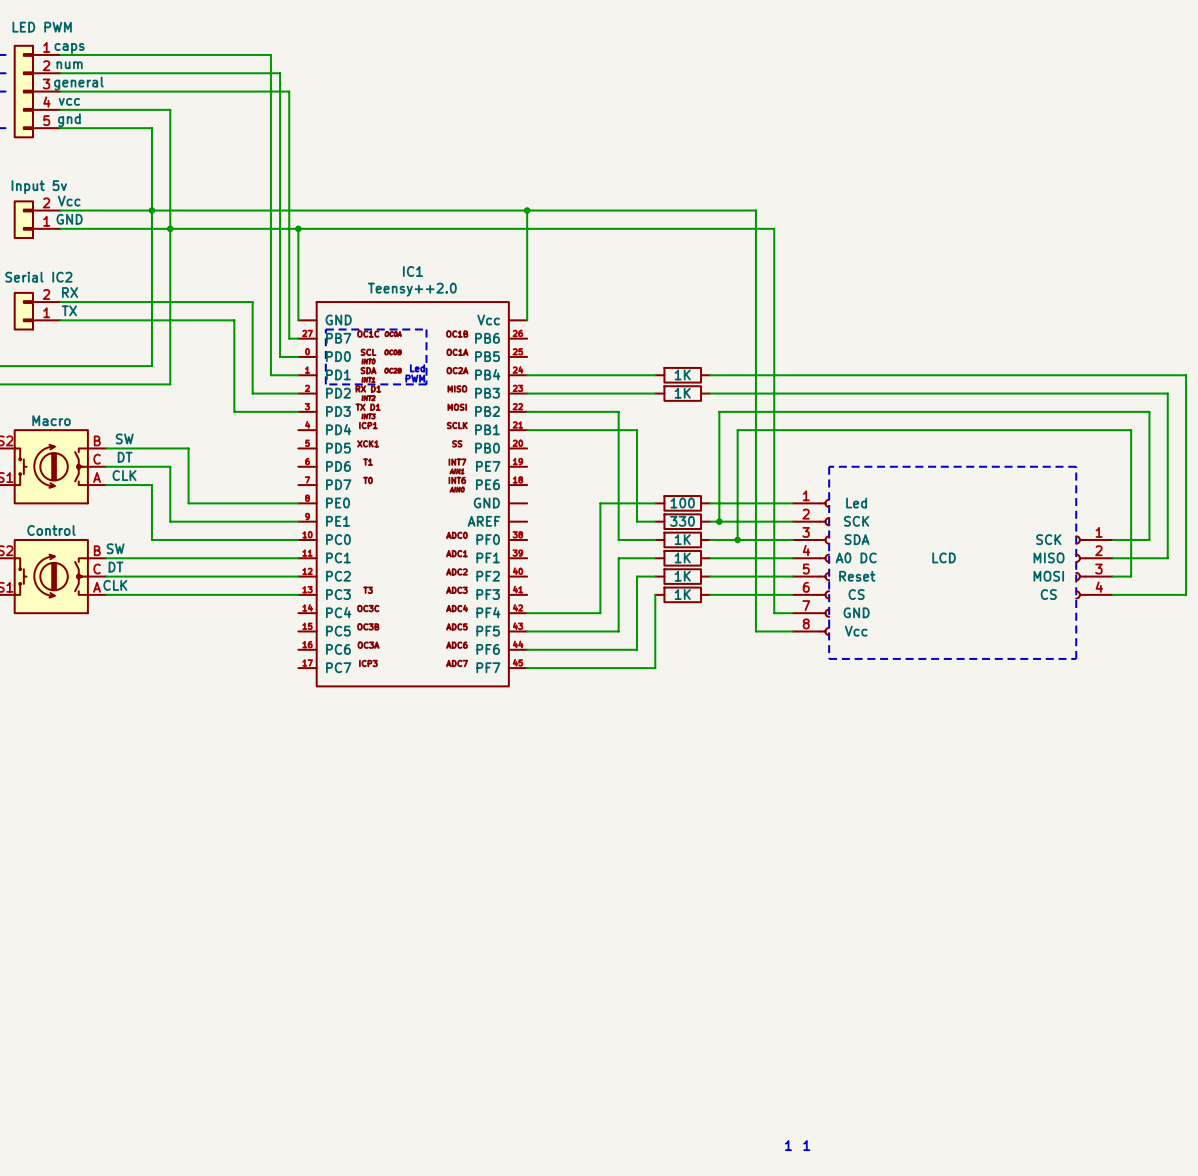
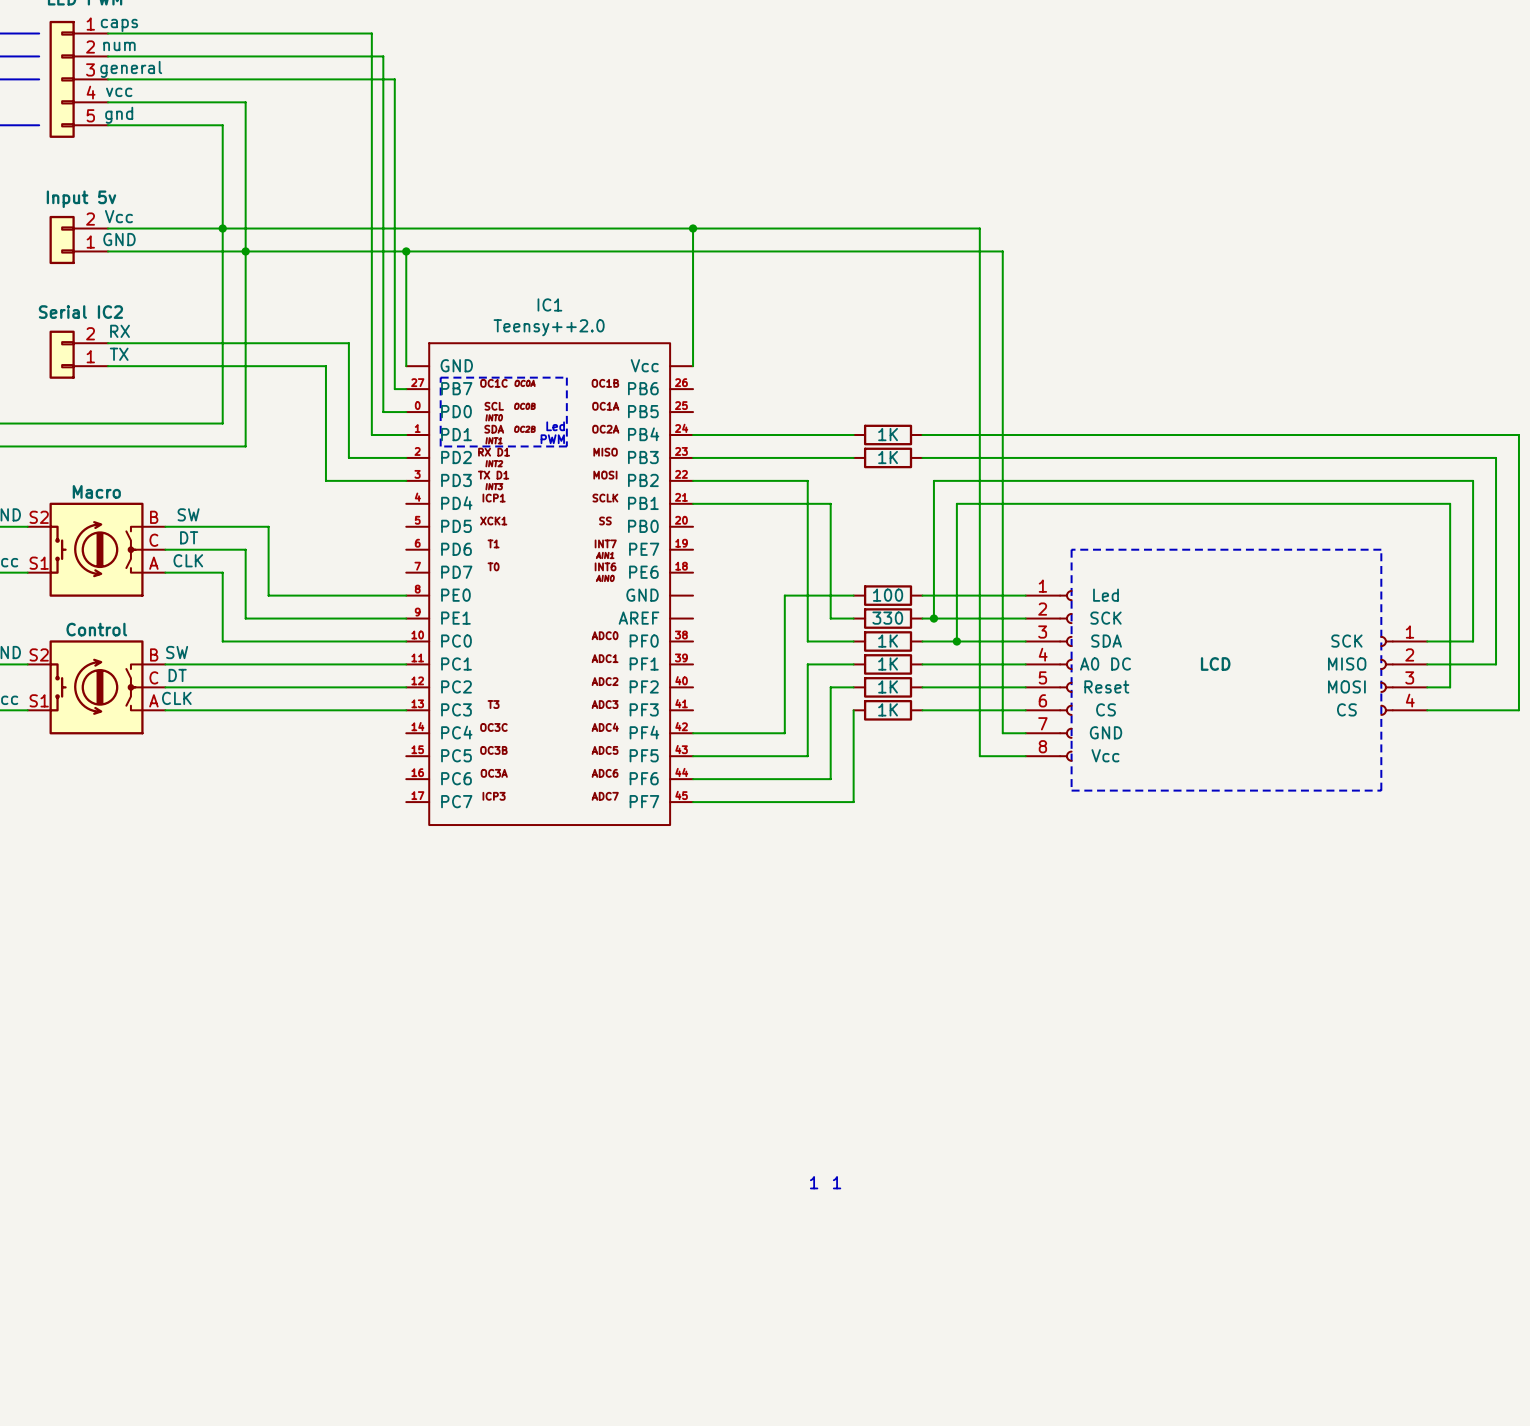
text: none -> 1 (814, 1182)
text: none -> 1 (837, 1182)
text: 1 (788, 1145) -> none
text: 1 (806, 1145) -> none

